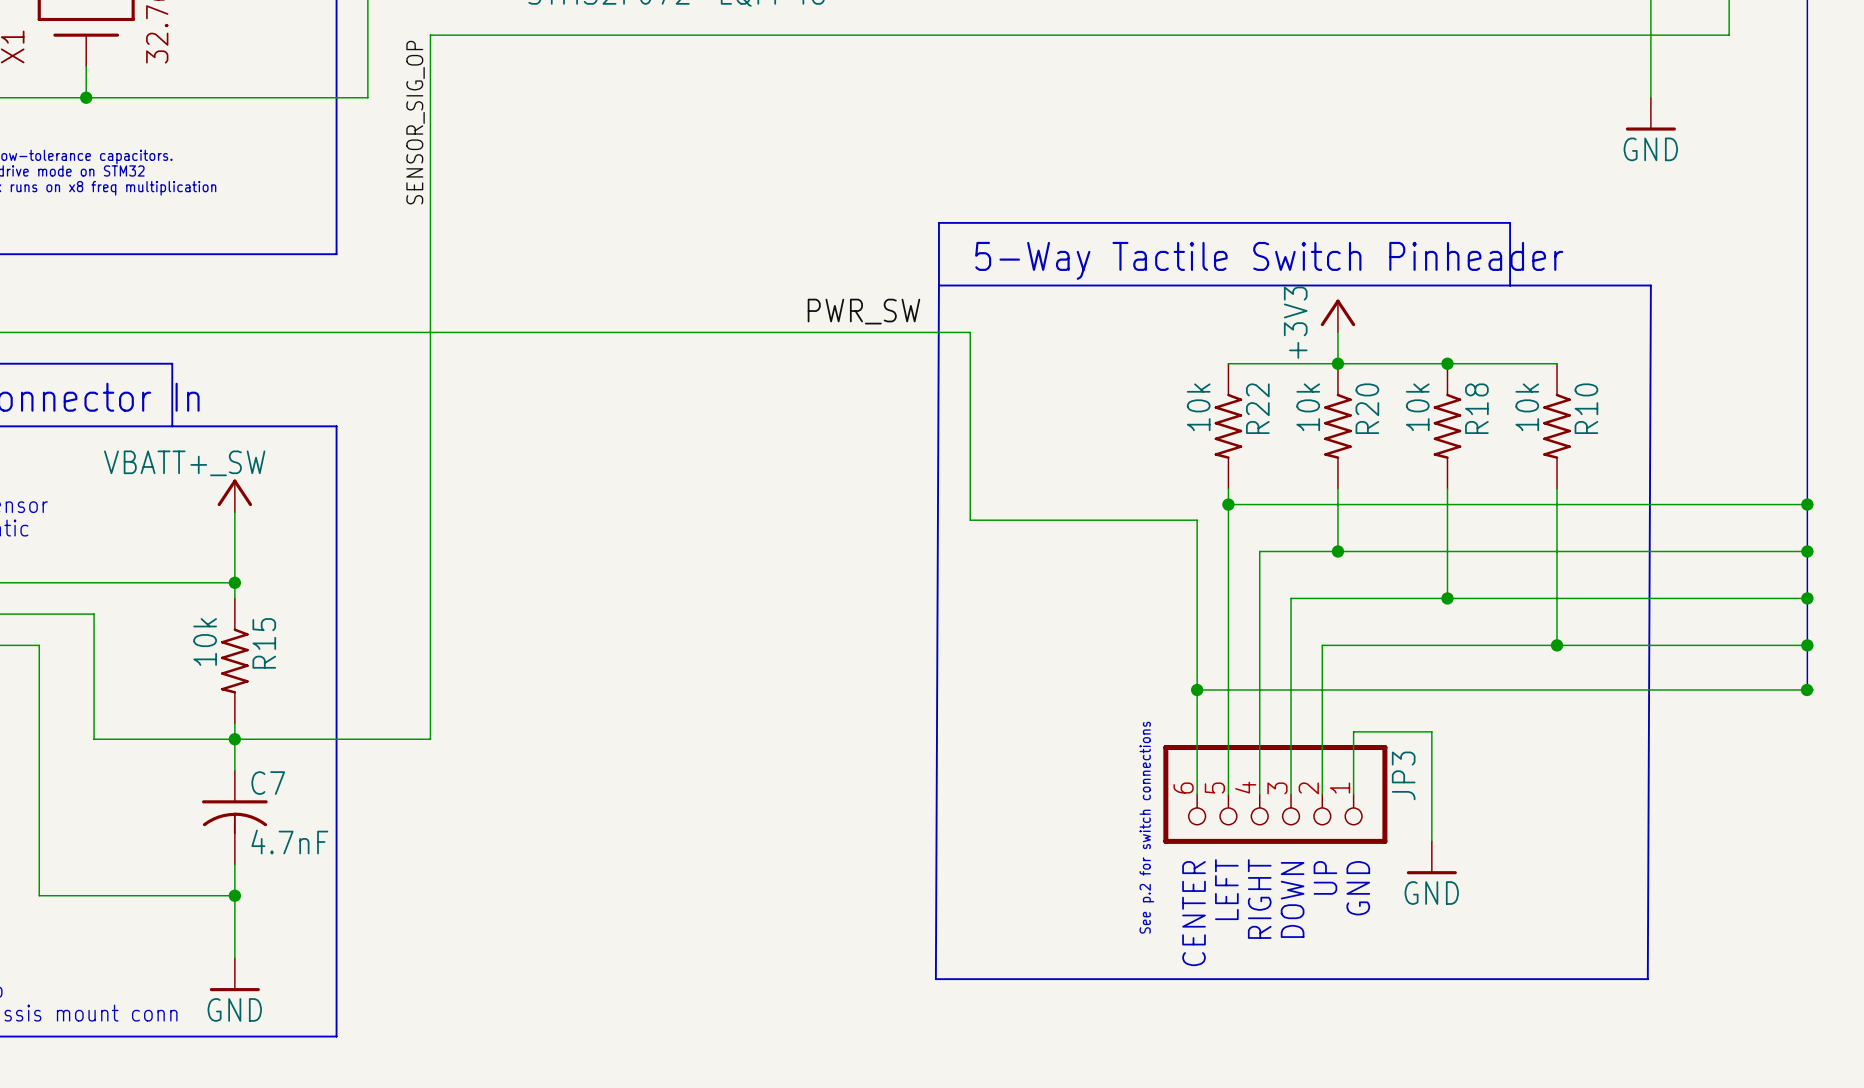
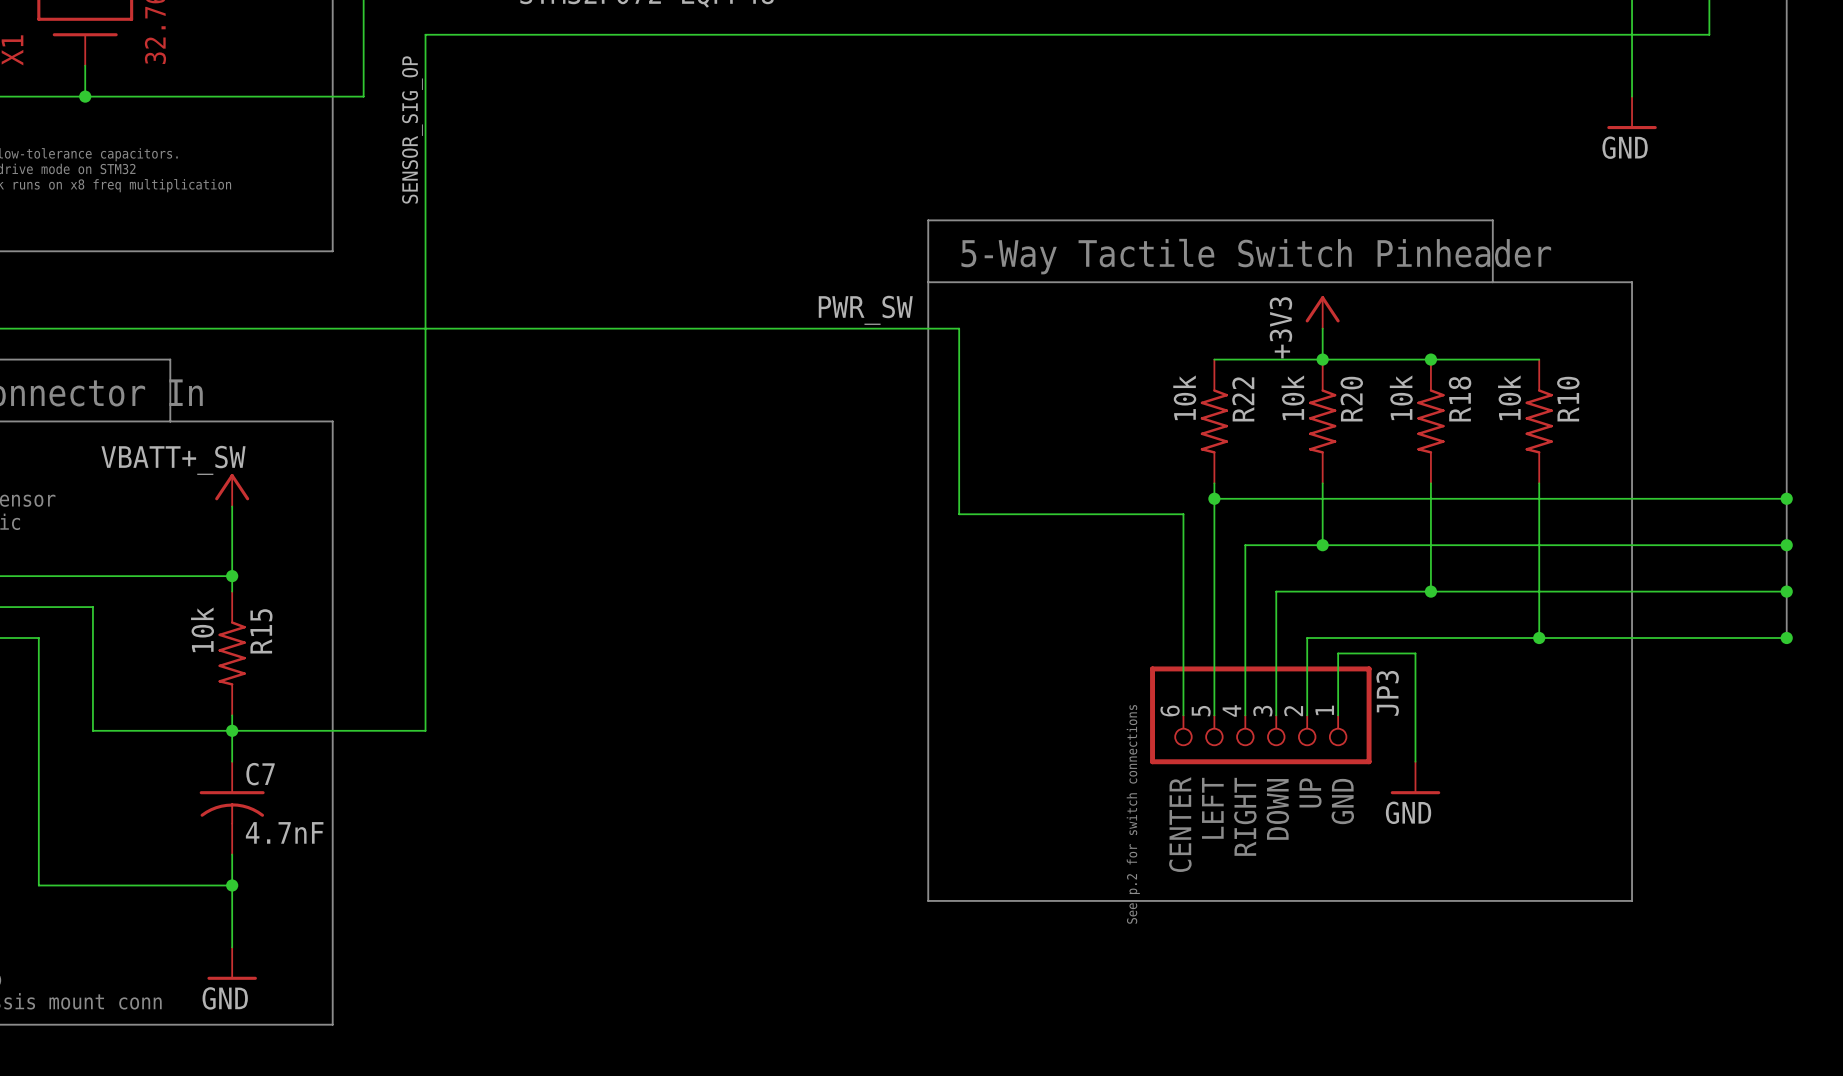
line: (938, 285) (935, 979) (1647, 979) (1650, 285) -> (928, 282) (928, 900) (1632, 900) (1632, 282)
bus: (1807, 645) (1807, 694) -> none
wire: (1197, 689) (1813, 689) -> none
junction: (1197, 689) -> none
junction: (1806, 689) -> none
wire: (1197, 723) (1197, 794) -> none
wire: (1228, 723) (1228, 794) -> none
wire: (1259, 723) (1259, 794) -> none
wire: (1291, 723) (1291, 794) -> none
wire: (1322, 723) (1322, 794) -> none
wire: (1431, 731) (1353, 731) (1353, 794) -> (1415, 723) (1415, 653) (1338, 653) (1338, 715)
wire: (1431, 770) (1431, 841) -> none
JP3 position: (1275, 794) -> (1260, 715)
power symbol position: GND (1431, 857) -> GND (1415, 777)
text position: UP (1325, 877) -> UP (1310, 792)
text position: GND (1358, 888) -> GND (1342, 801)
text position: LEFT (1226, 889) -> LEFT (1212, 808)
text position: RIGHT (1259, 899) -> RIGHT (1245, 816)
text position: DOWN (1292, 899) -> DOWN (1277, 809)
text position: CENTER (1194, 913) -> CENTER (1180, 824)

